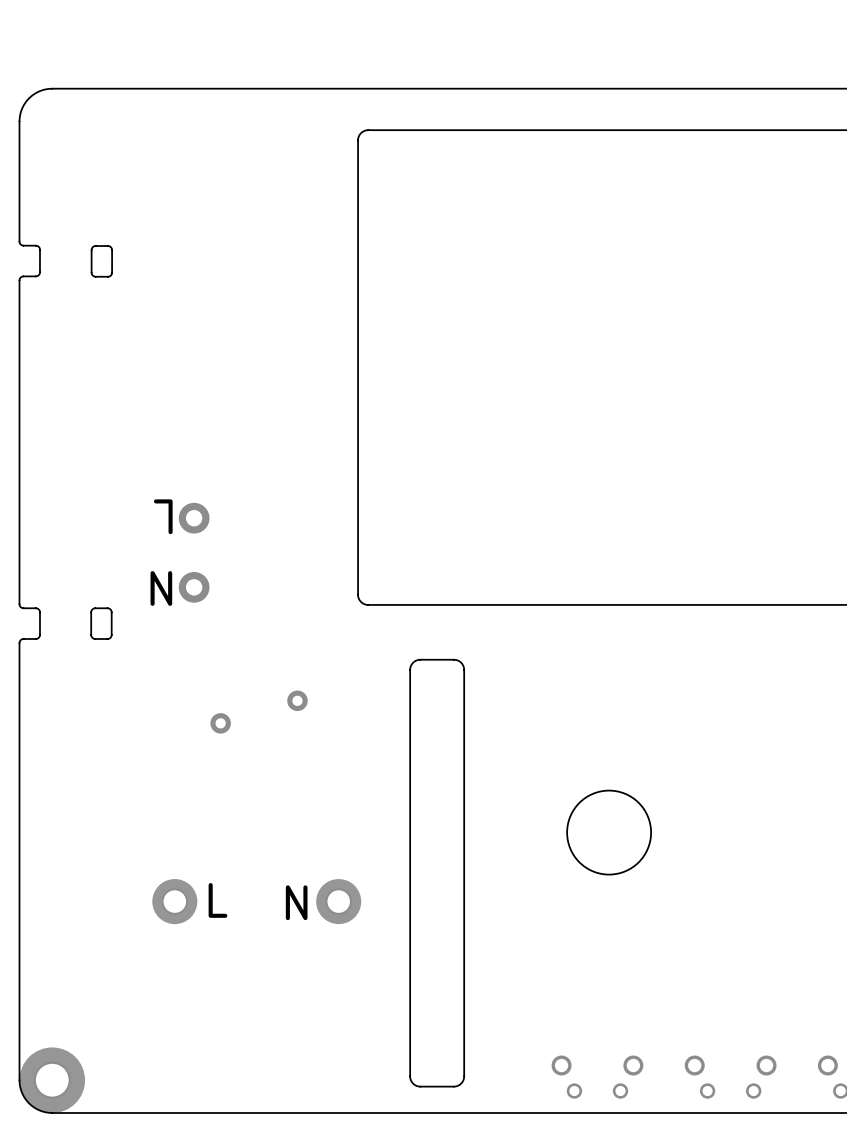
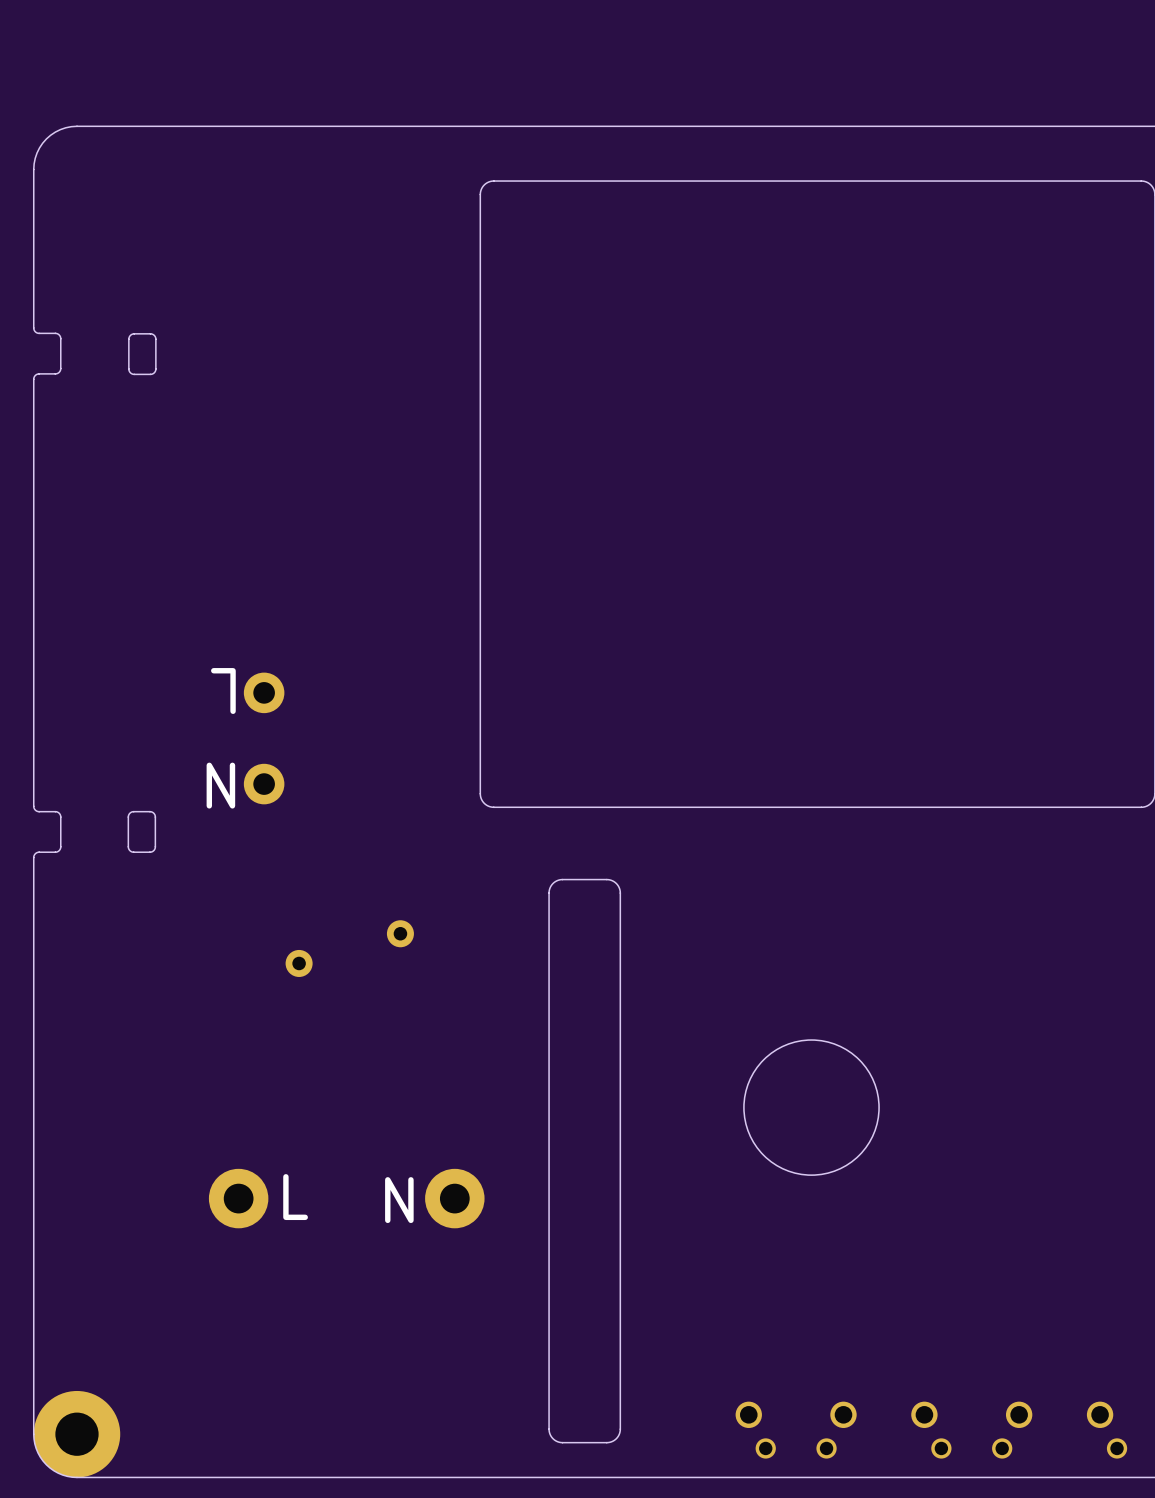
round board edge size: [566, 790, 652, 876] -> [743, 1039, 880, 1176]

